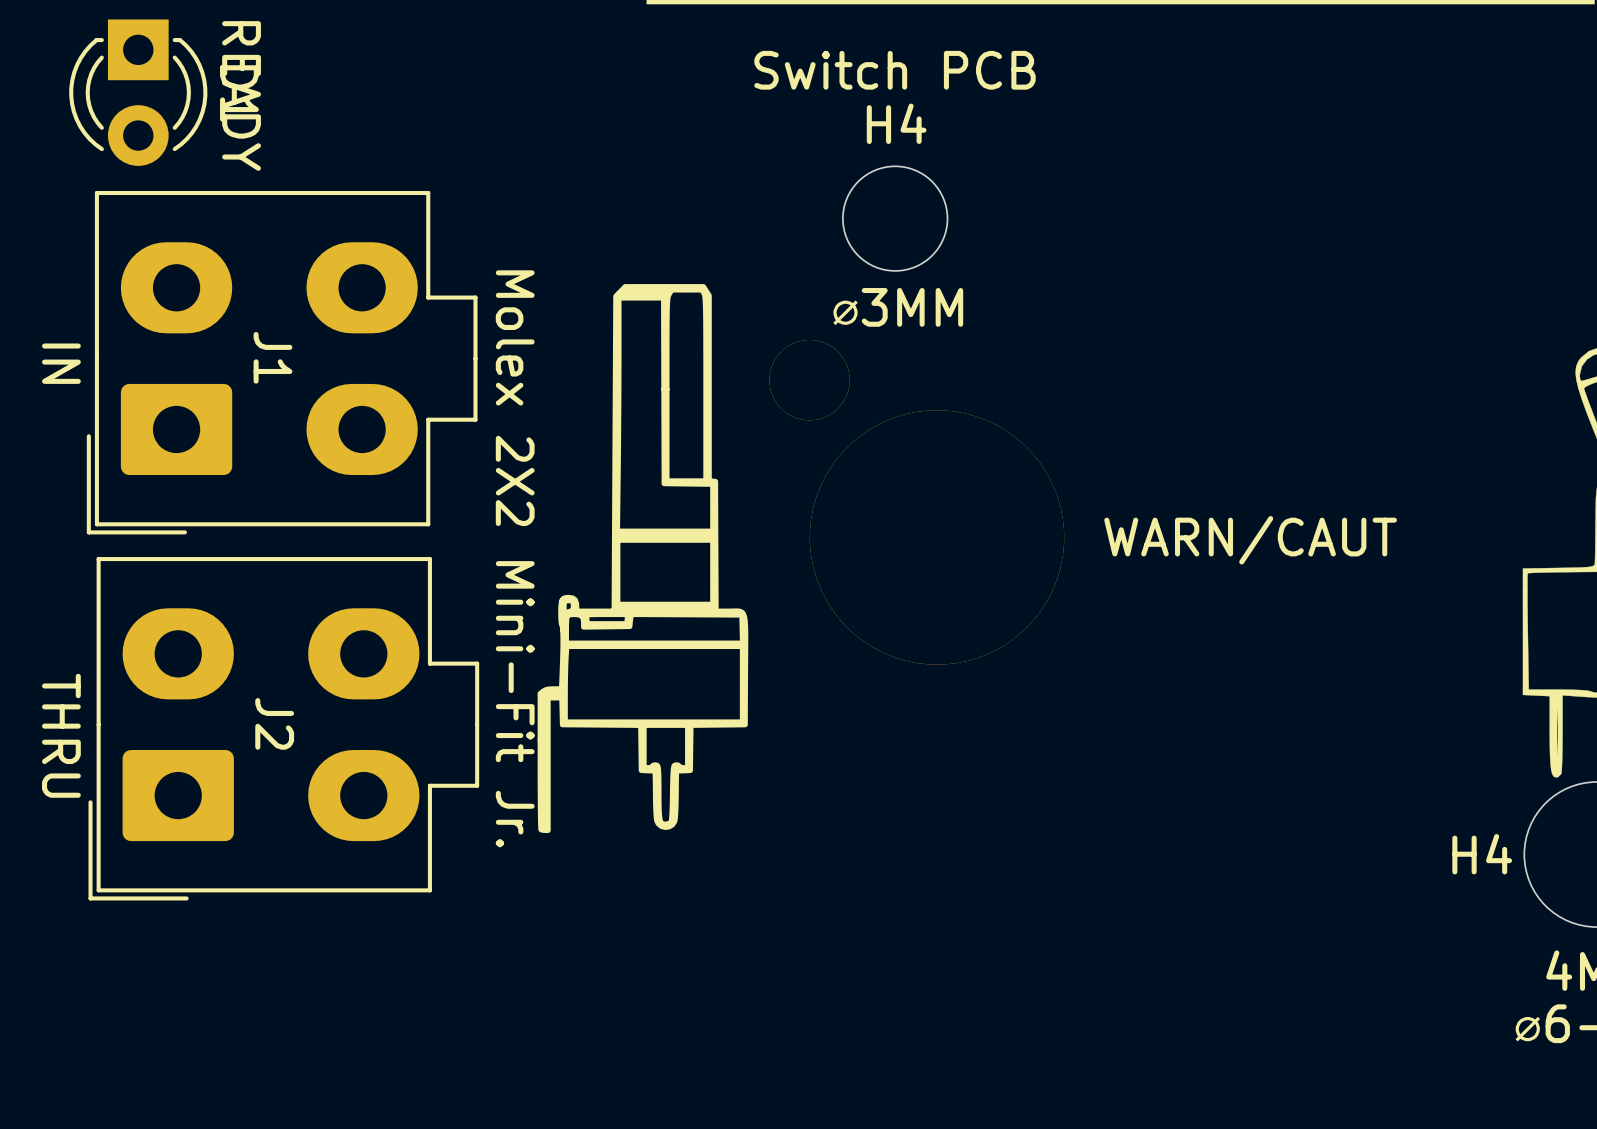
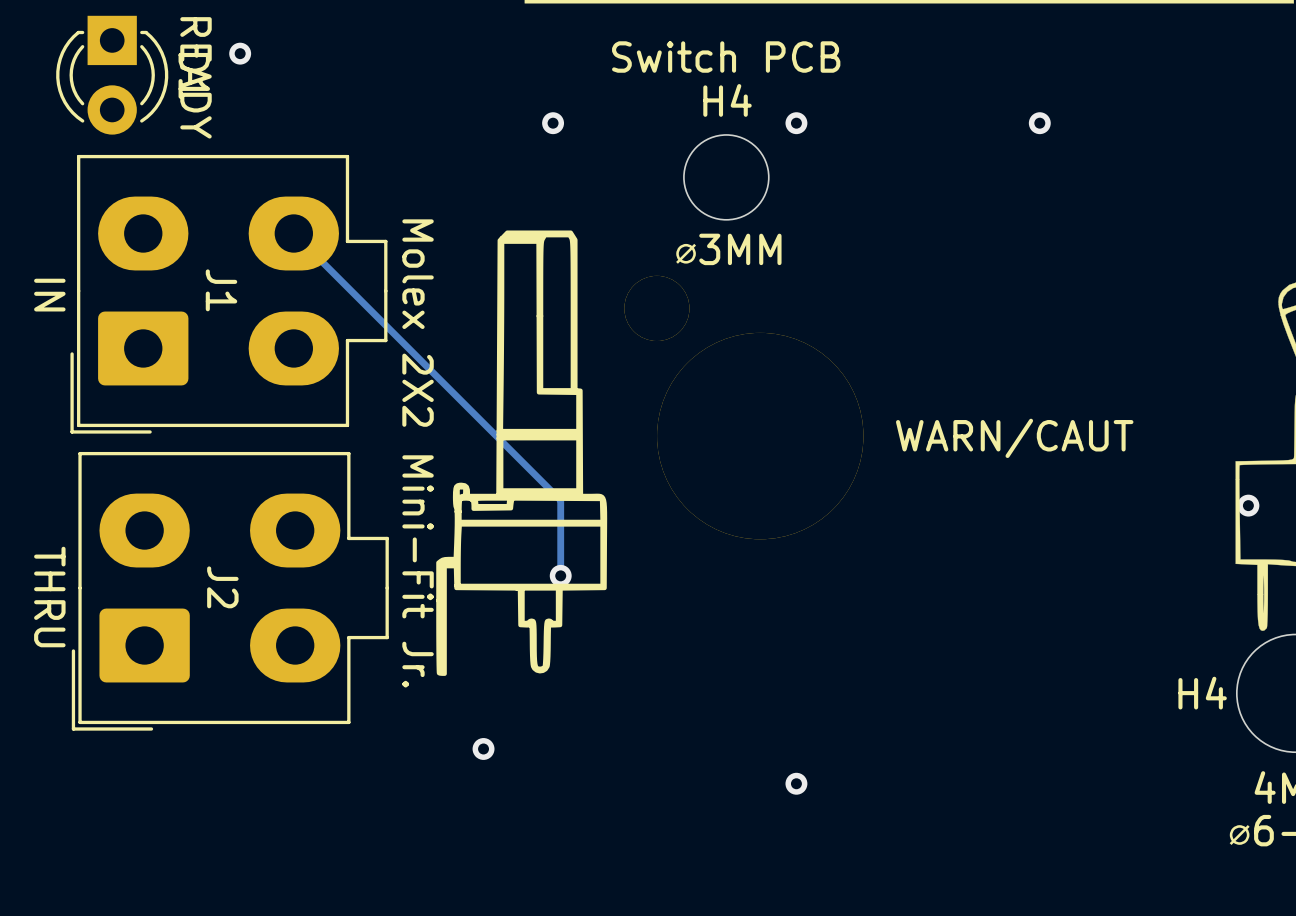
via: none -> (240, 53)
via: none -> (553, 123)
via: none -> (796, 123)
via: none -> (1039, 123)
track: none -> (293, 233) (560, 500) (560, 575)
via: none -> (1248, 505)
via: none -> (560, 575)
via: none -> (483, 748)
via: none -> (796, 783)

